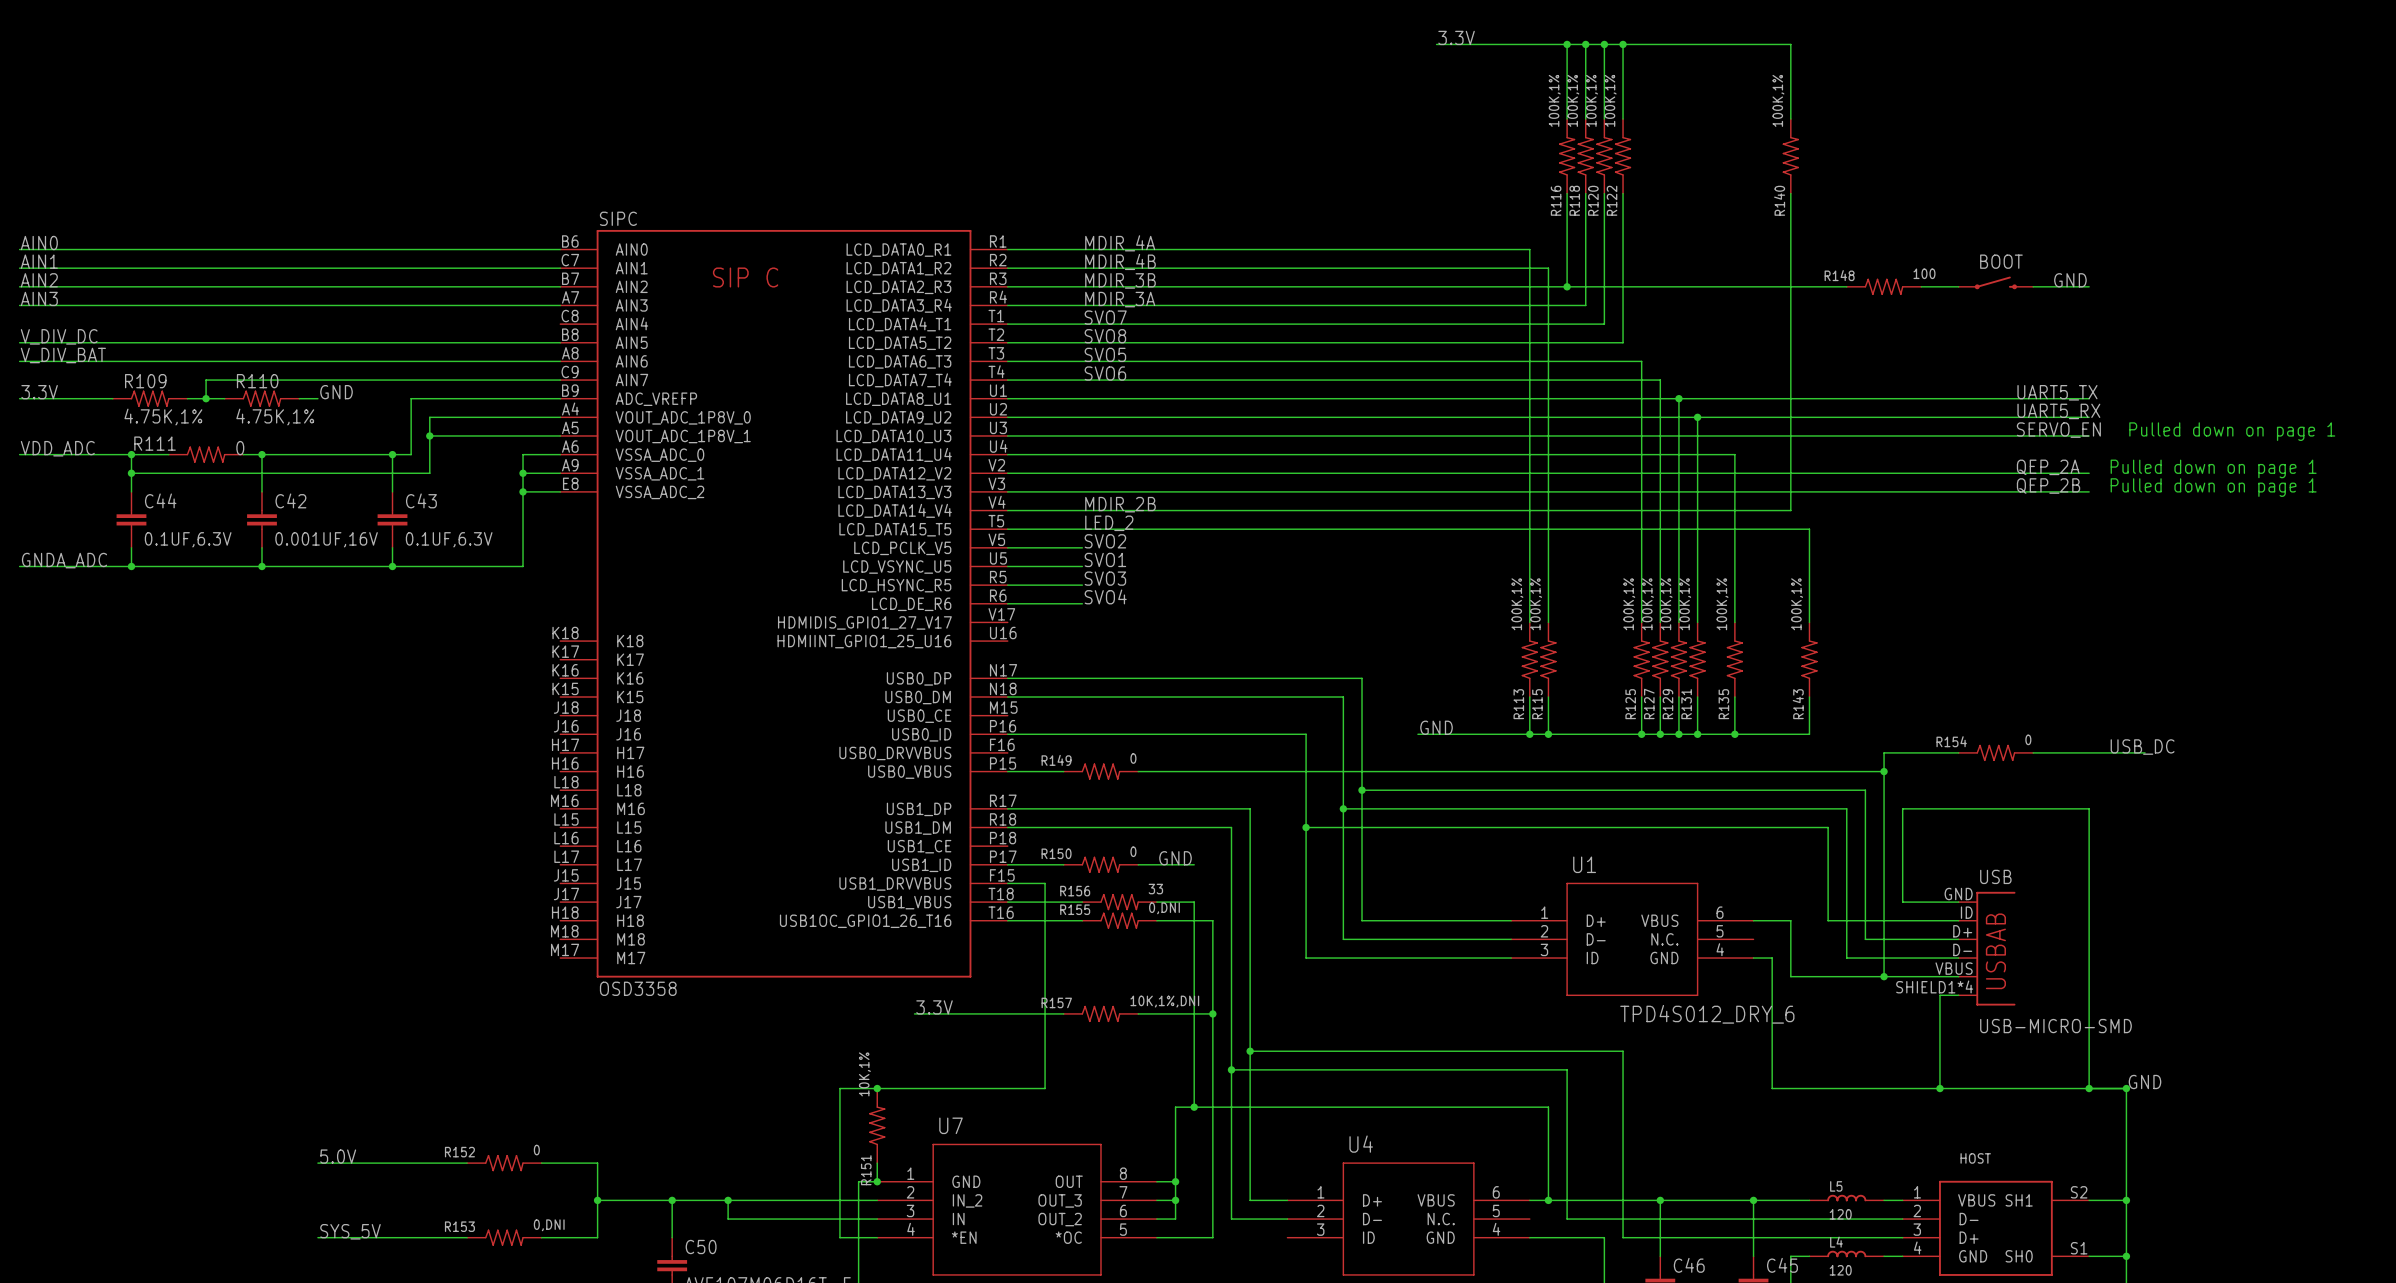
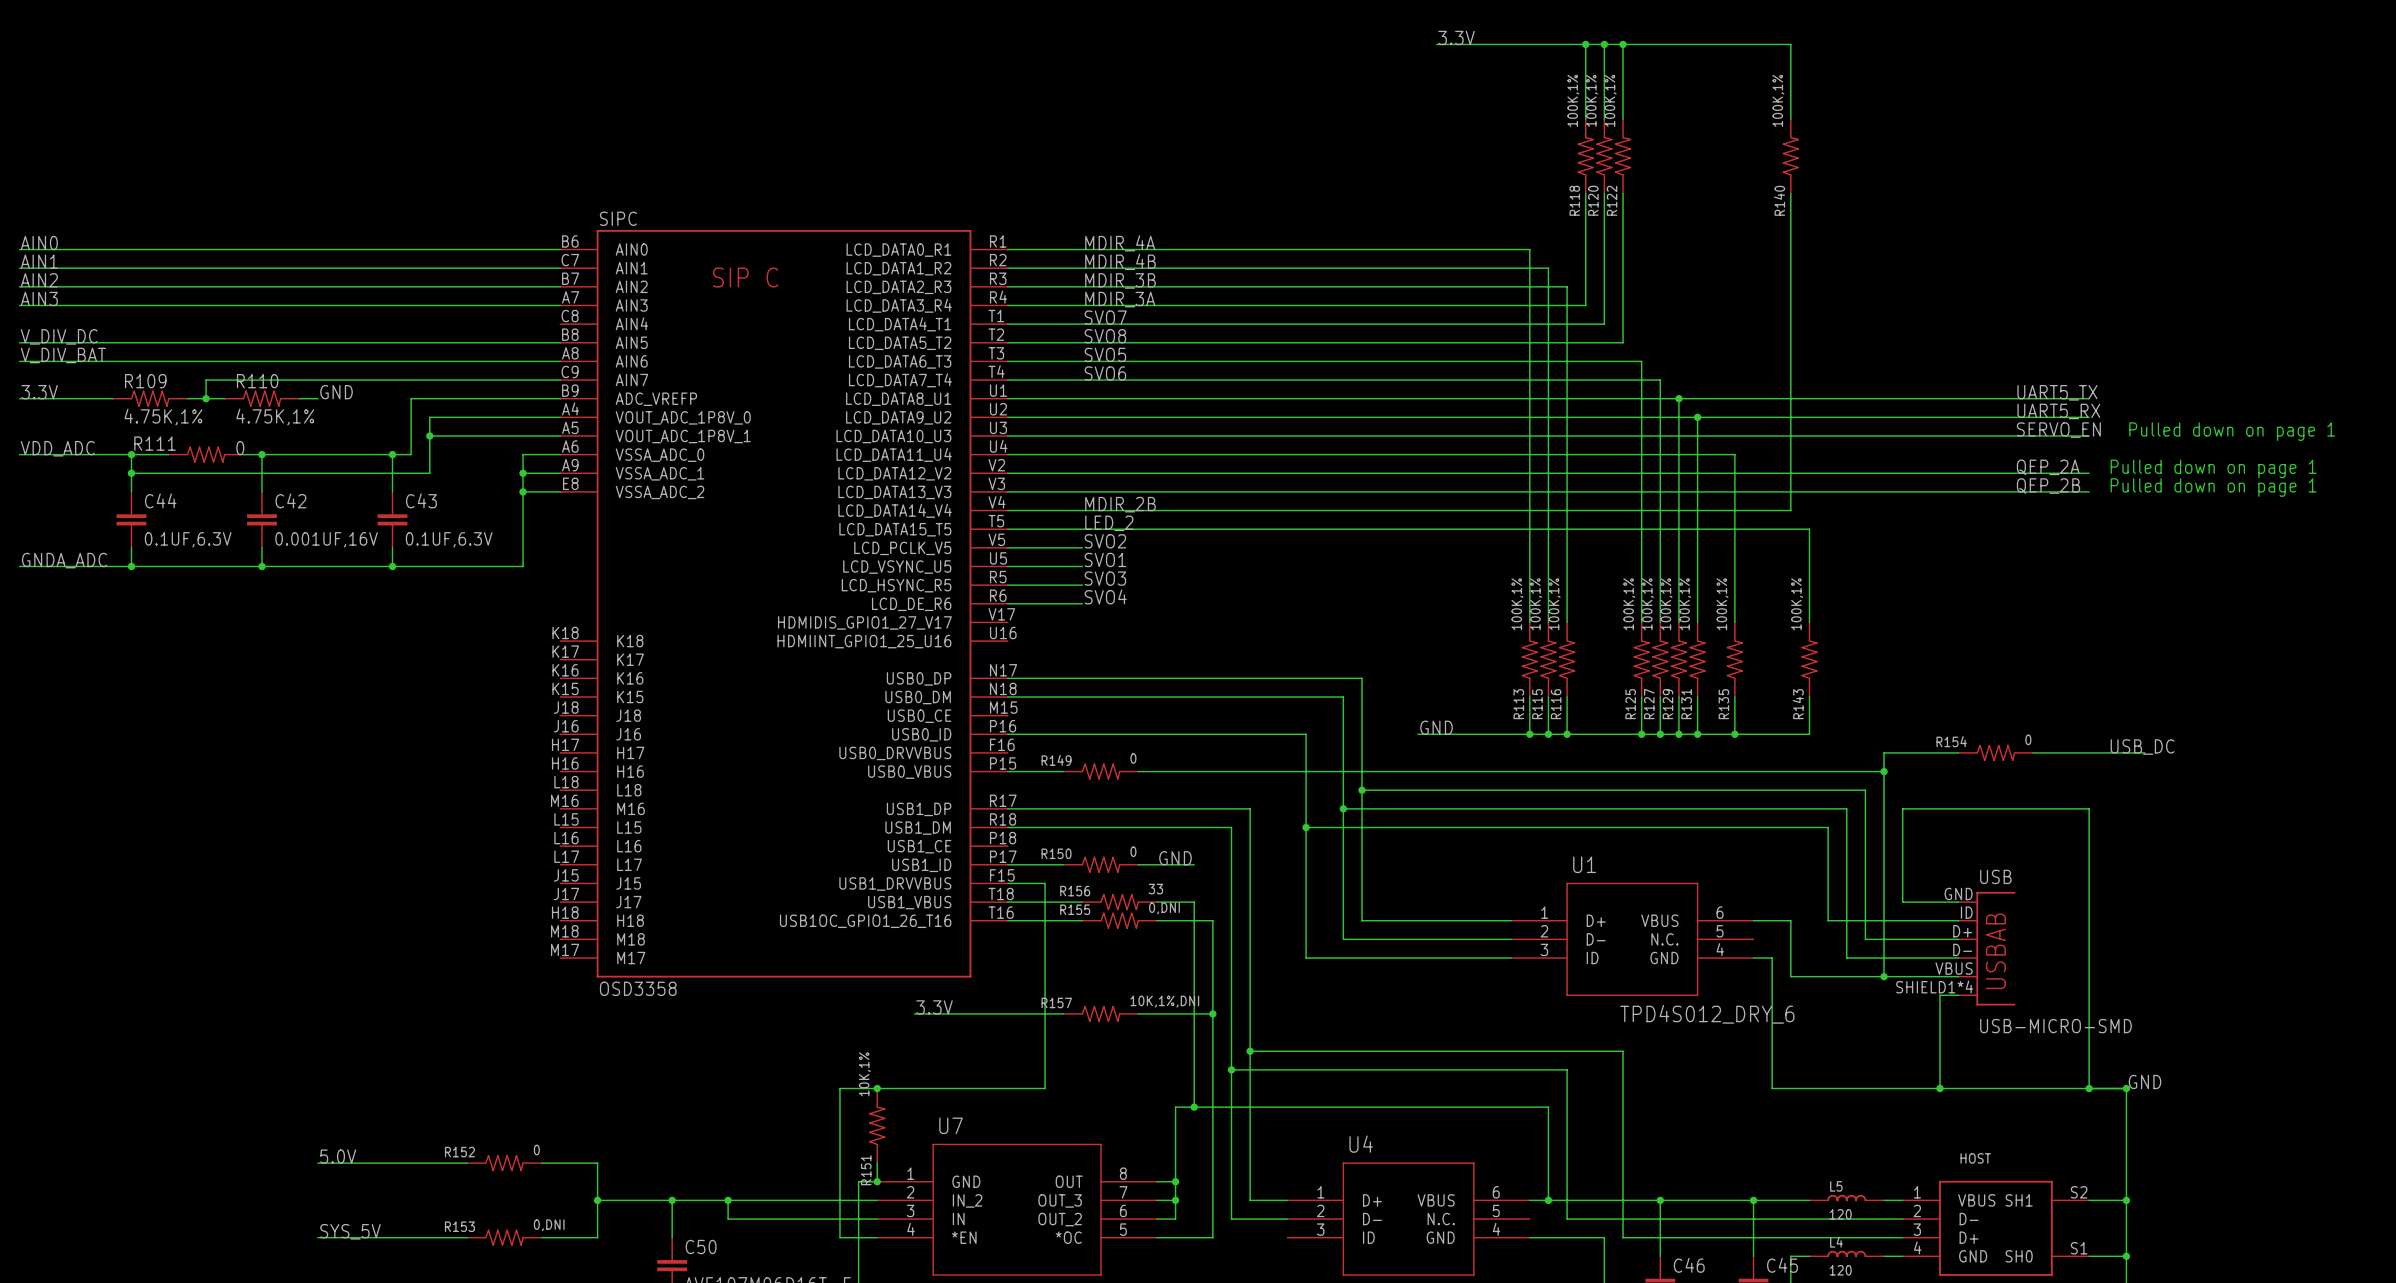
wire: (1567, 44) (1567, 119) -> none
junction: (1567, 44) -> none
R116 position: (1567, 156) -> (1567, 659)
wire: (1567, 193) (1567, 286) (1846, 286) -> none
label: GND (2070, 280) -> none
BOOT: (1995, 282) -> none
wire: none -> (1567, 286) (1567, 622)
junction: (1567, 286) -> none
R148: 100 (1884, 286) -> none
wire: (1921, 286) (1958, 286) -> none
wire: (2033, 286) (2089, 286) -> none
wire: none -> (1567, 697) (1567, 734)
junction: none -> (1567, 734)

